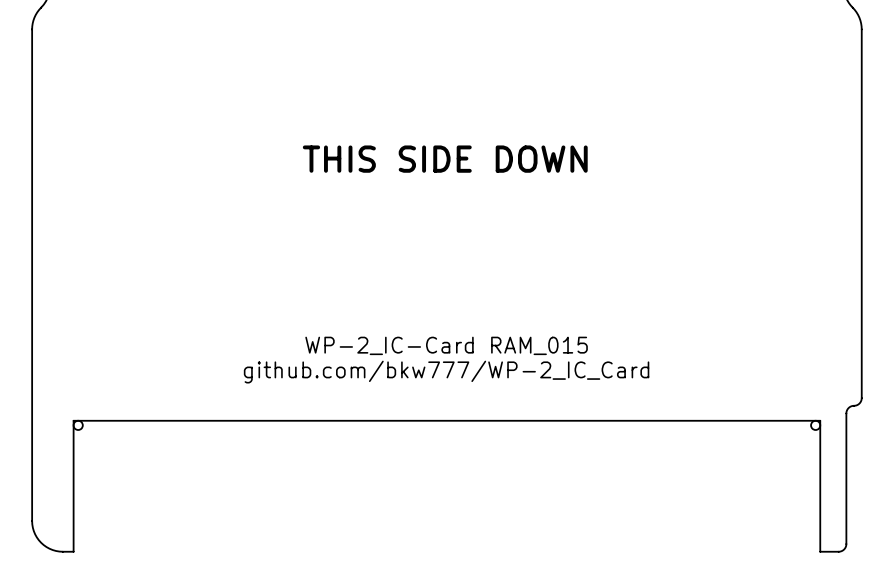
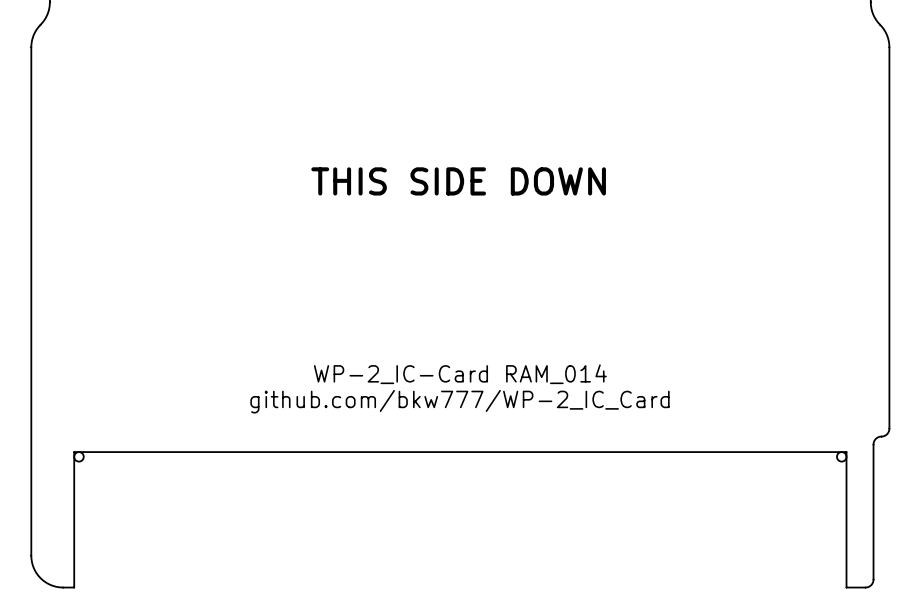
text: WP-2_IC-Card RAM_015 (446, 345) -> WP-2_IC-Card RAM_014 (460, 374)

